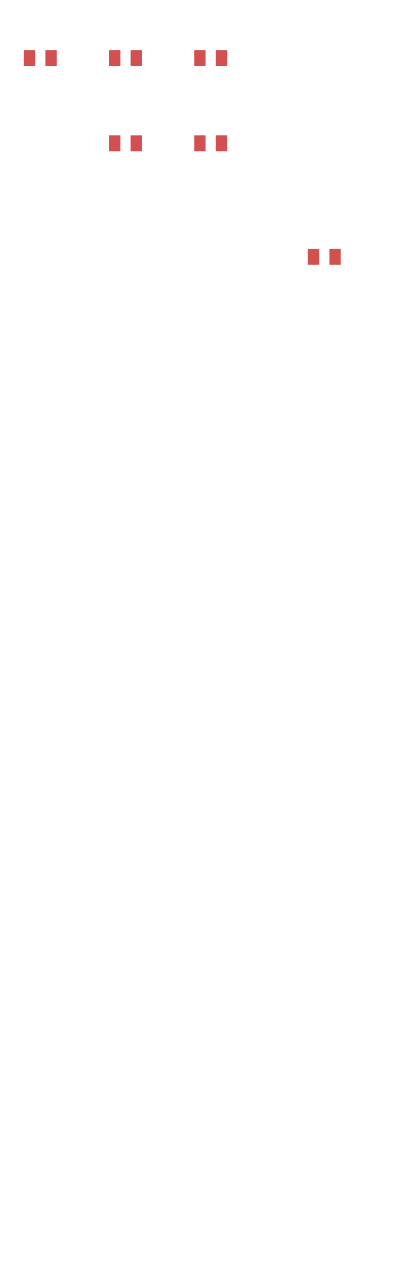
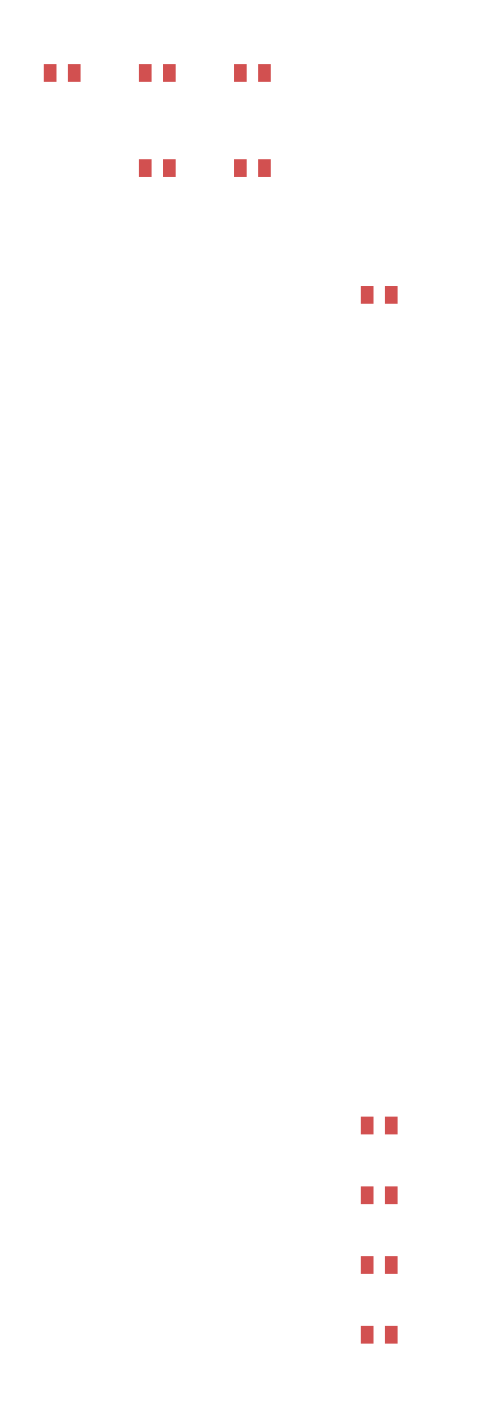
part: none -> (379, 1125)
part: none -> (379, 1195)
part: none -> (379, 1265)
part: none -> (379, 1334)

